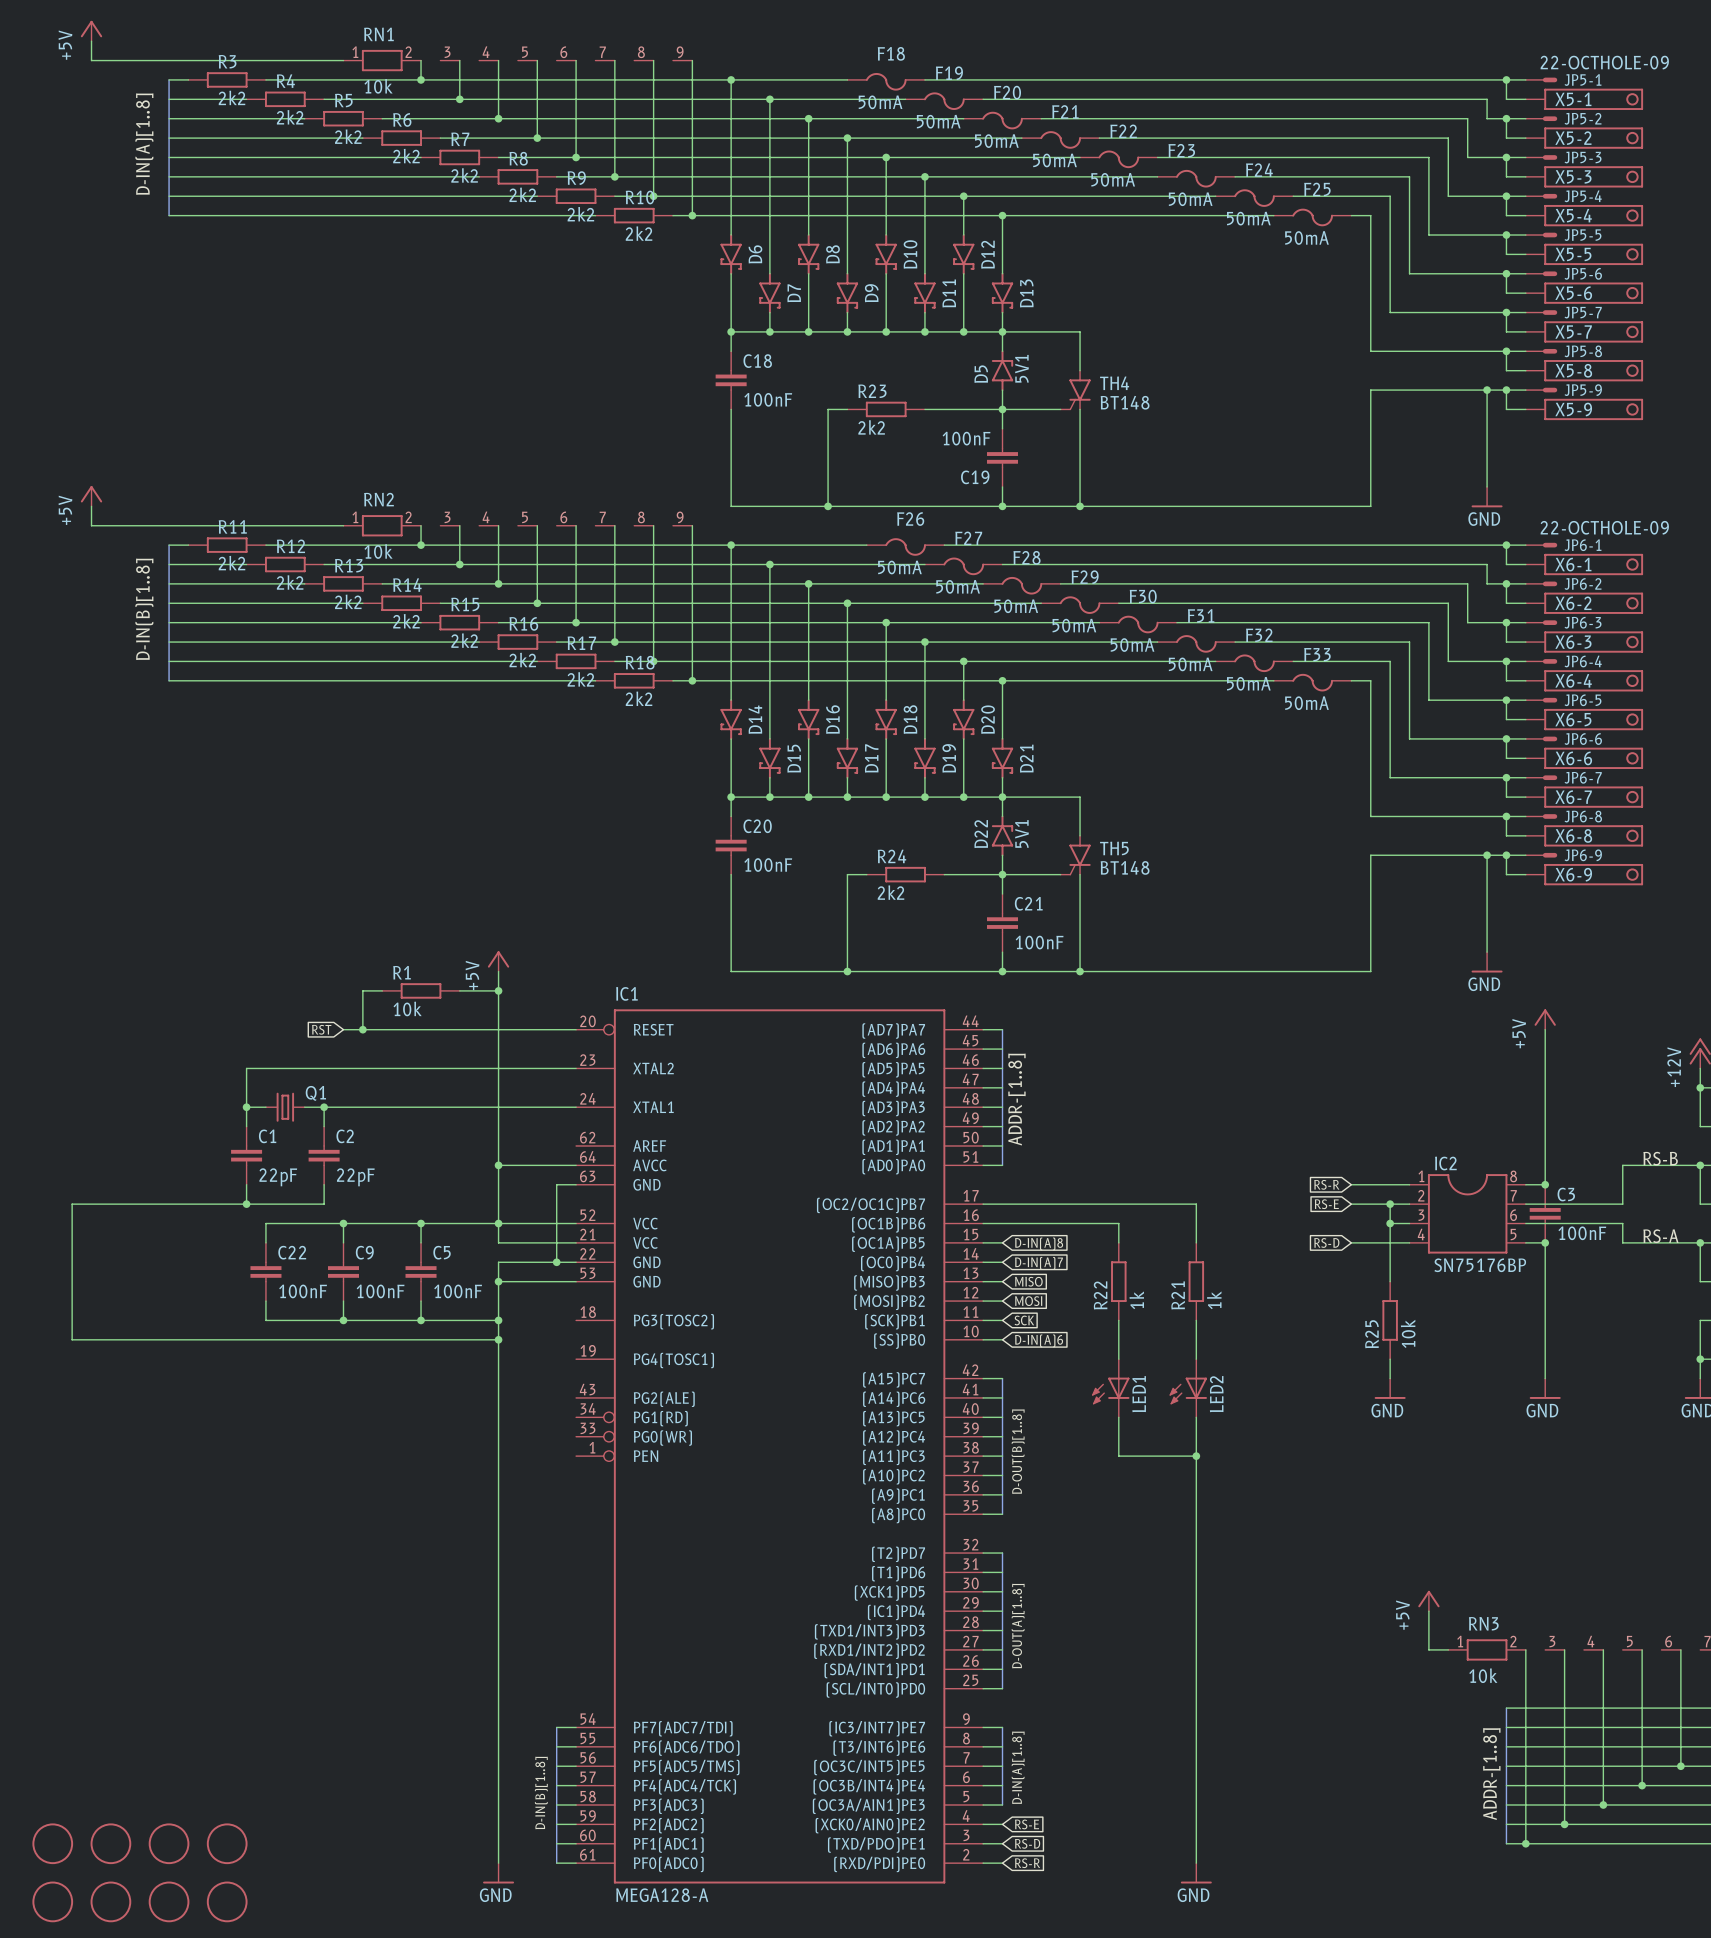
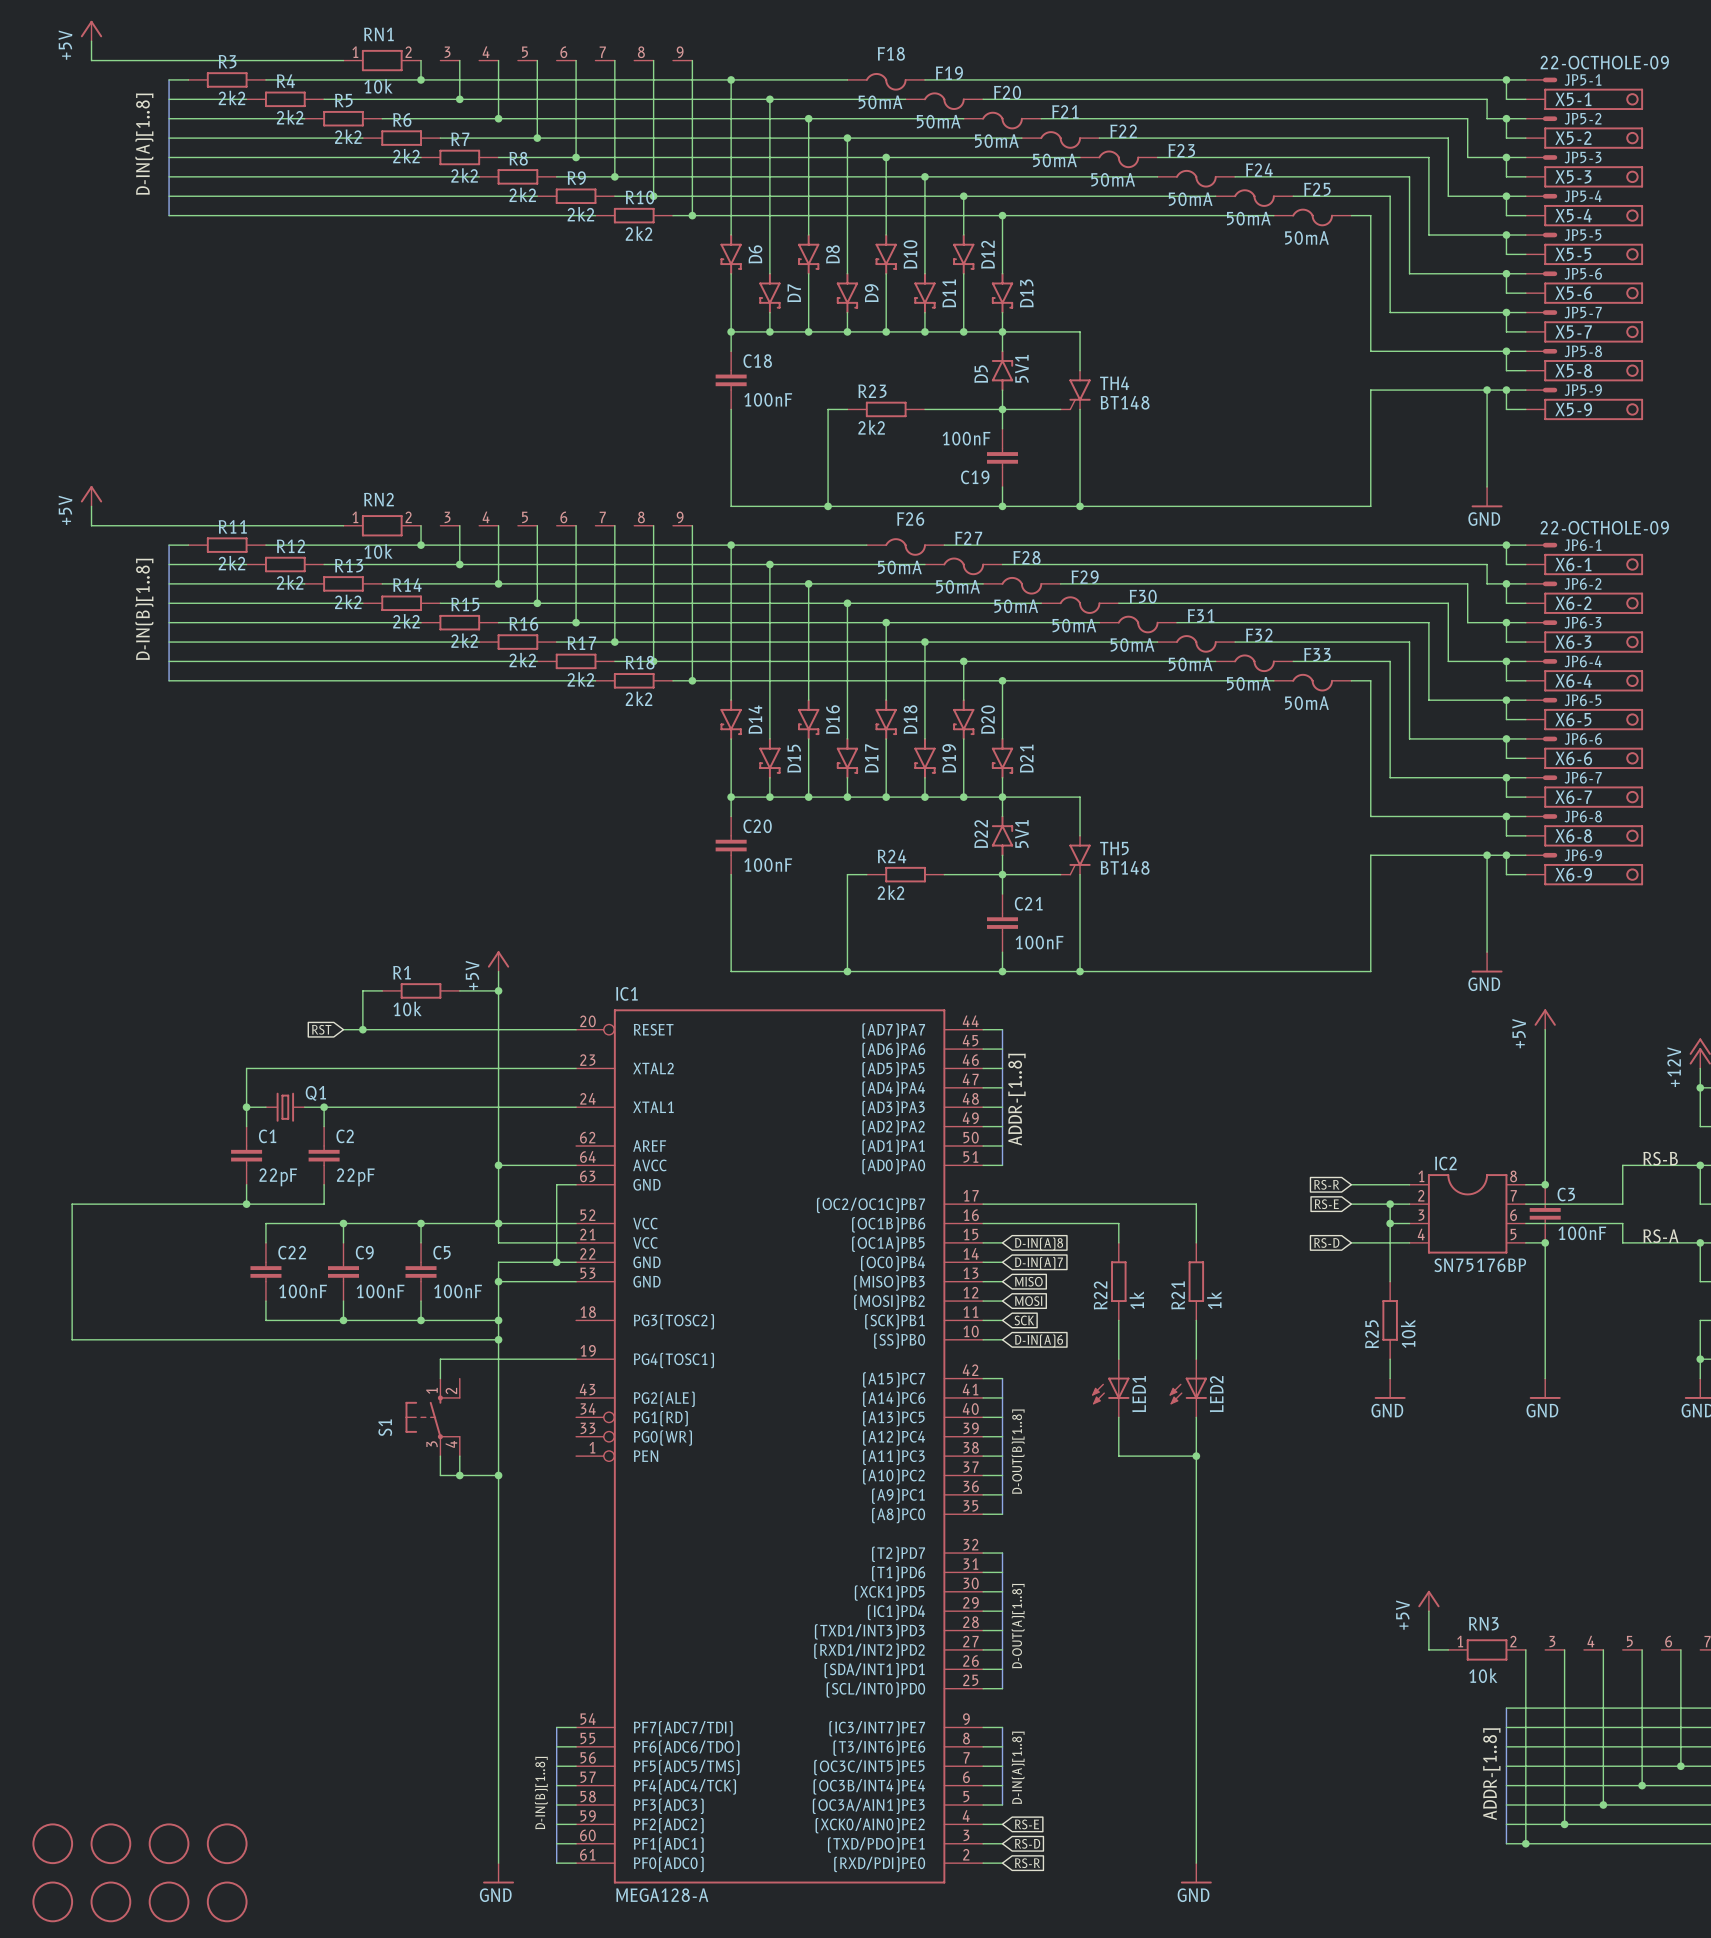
wire: none -> (576, 1359) (440, 1359) (440, 1378)
S1: none -> (432, 1417)
wire: none -> (440, 1456) (440, 1475) (498, 1475)
wire: none -> (459, 1456) (459, 1475)
junction: none -> (459, 1475)
junction: none -> (498, 1475)

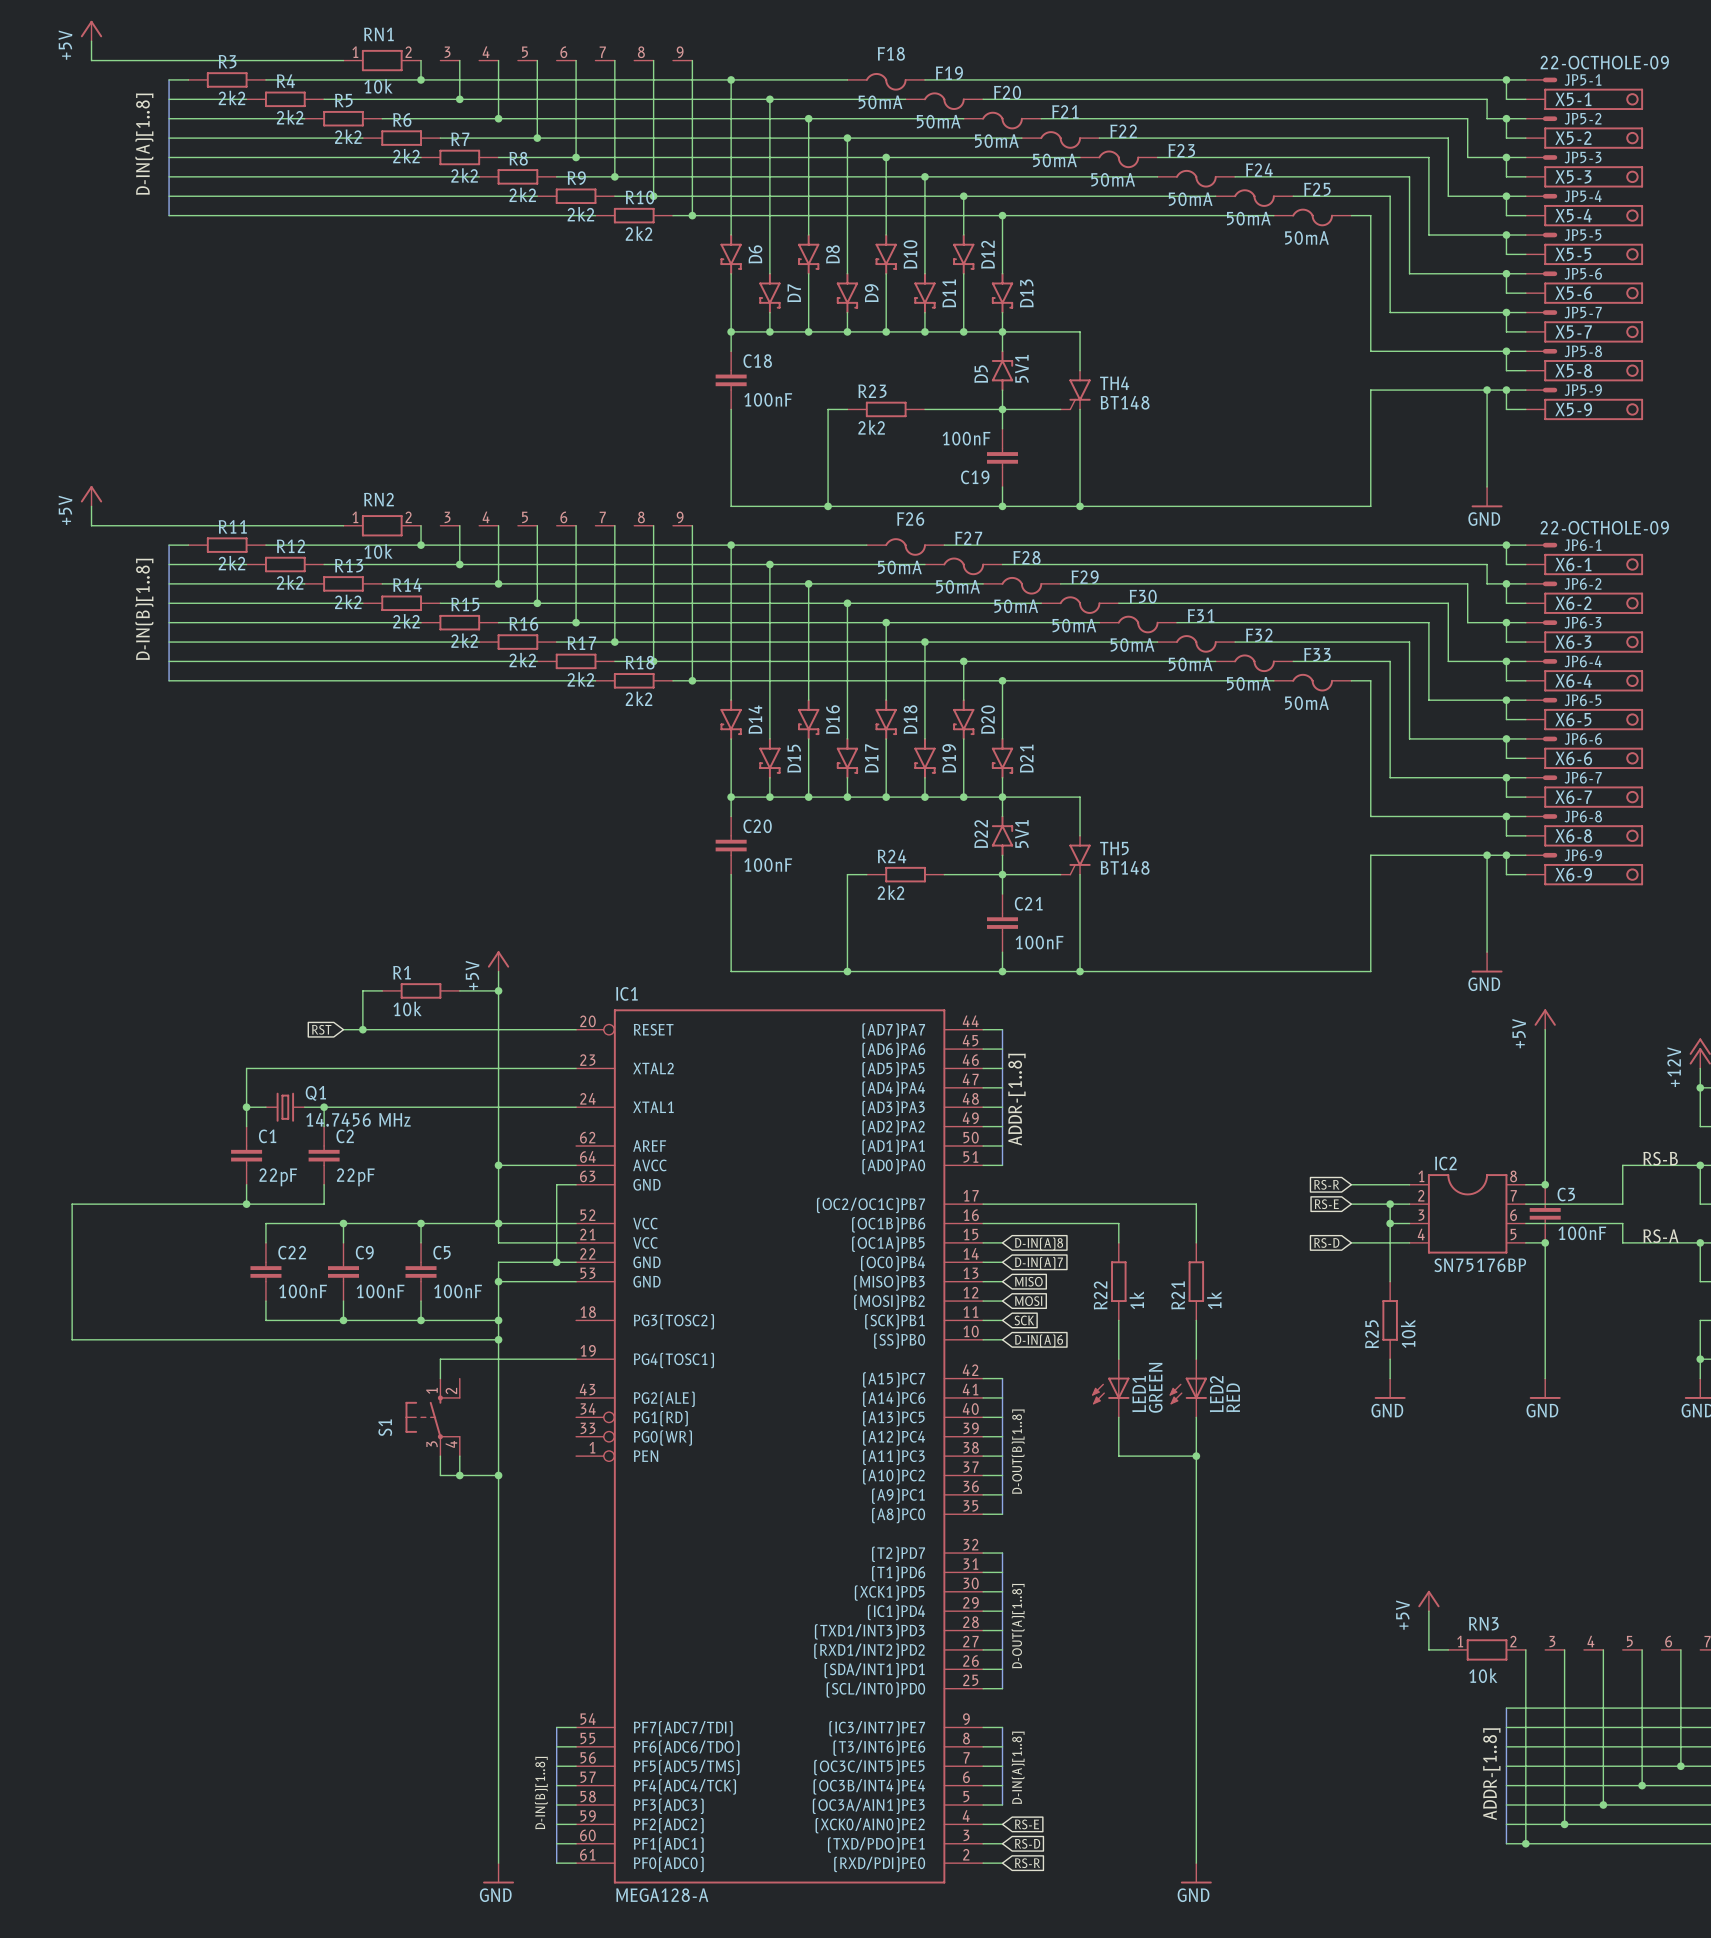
Q1 value: none -> 14.7456 MHz (358, 1119)
LED1 value: none -> GREEN (1155, 1387)
LED2 value: none -> RED (1233, 1397)
part: (52, 1843) -> none
part: (110, 1843) -> none
part: (169, 1843) -> none
part: (227, 1843) -> none
part: (52, 1901) -> none
part: (110, 1901) -> none
part: (169, 1901) -> none
part: (227, 1901) -> none

